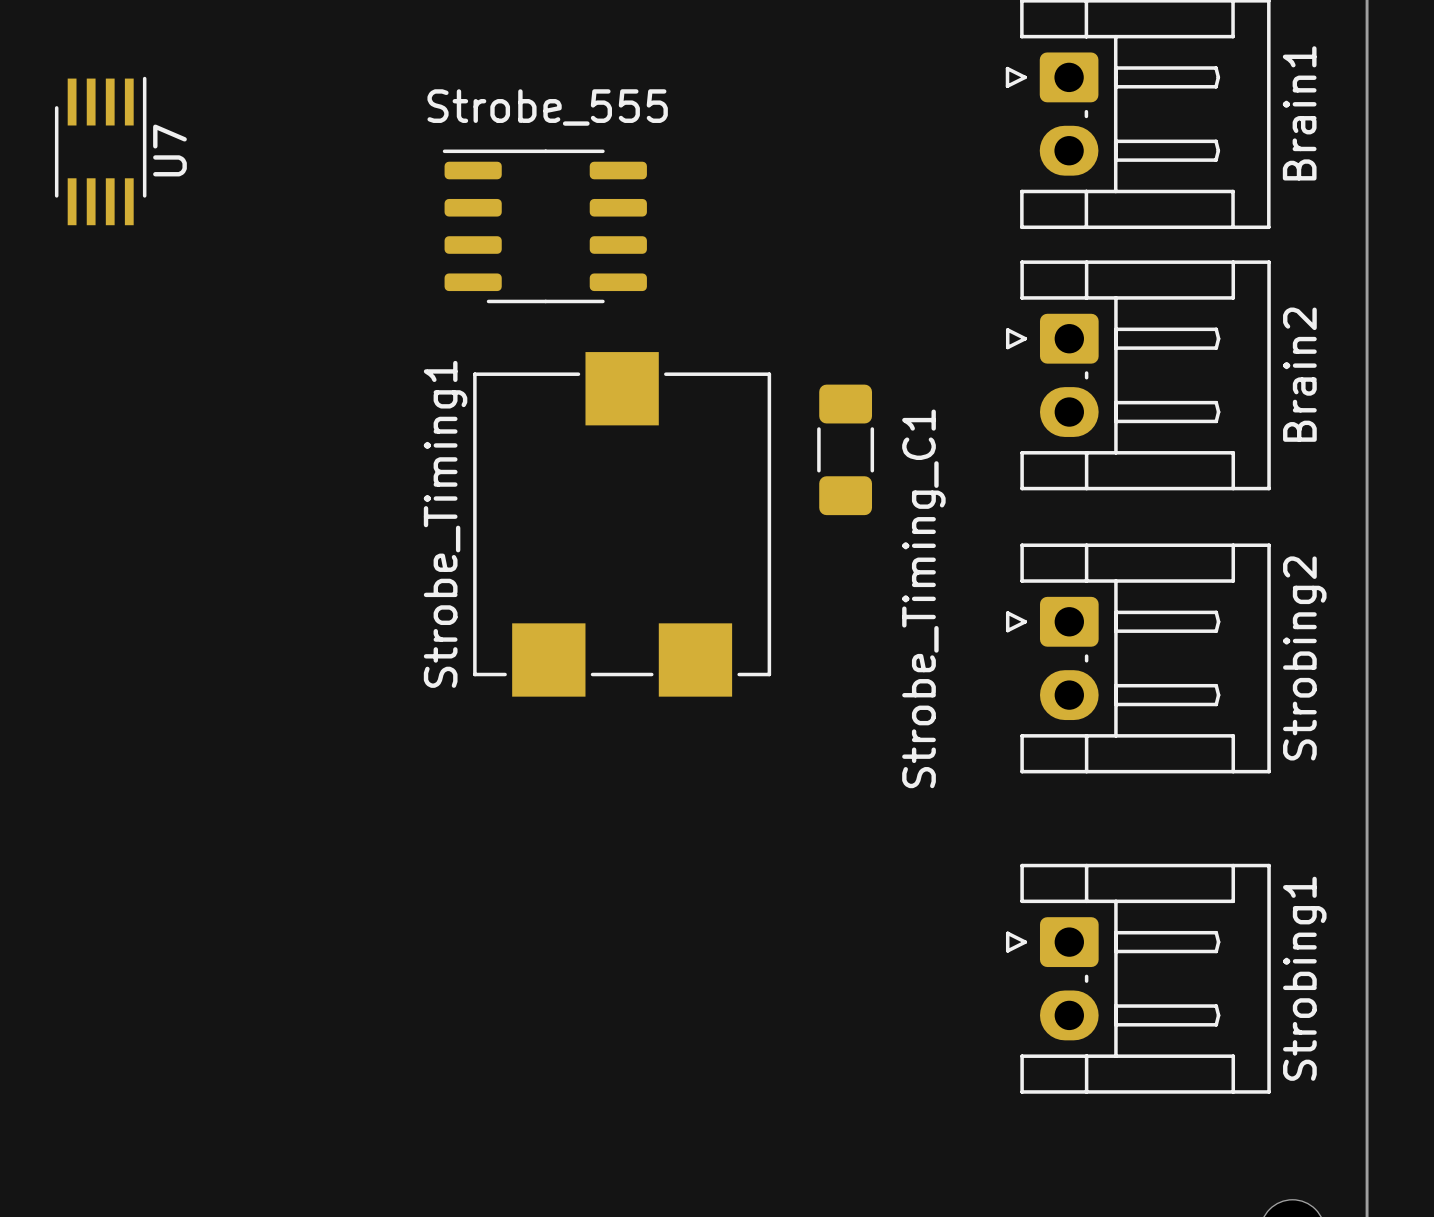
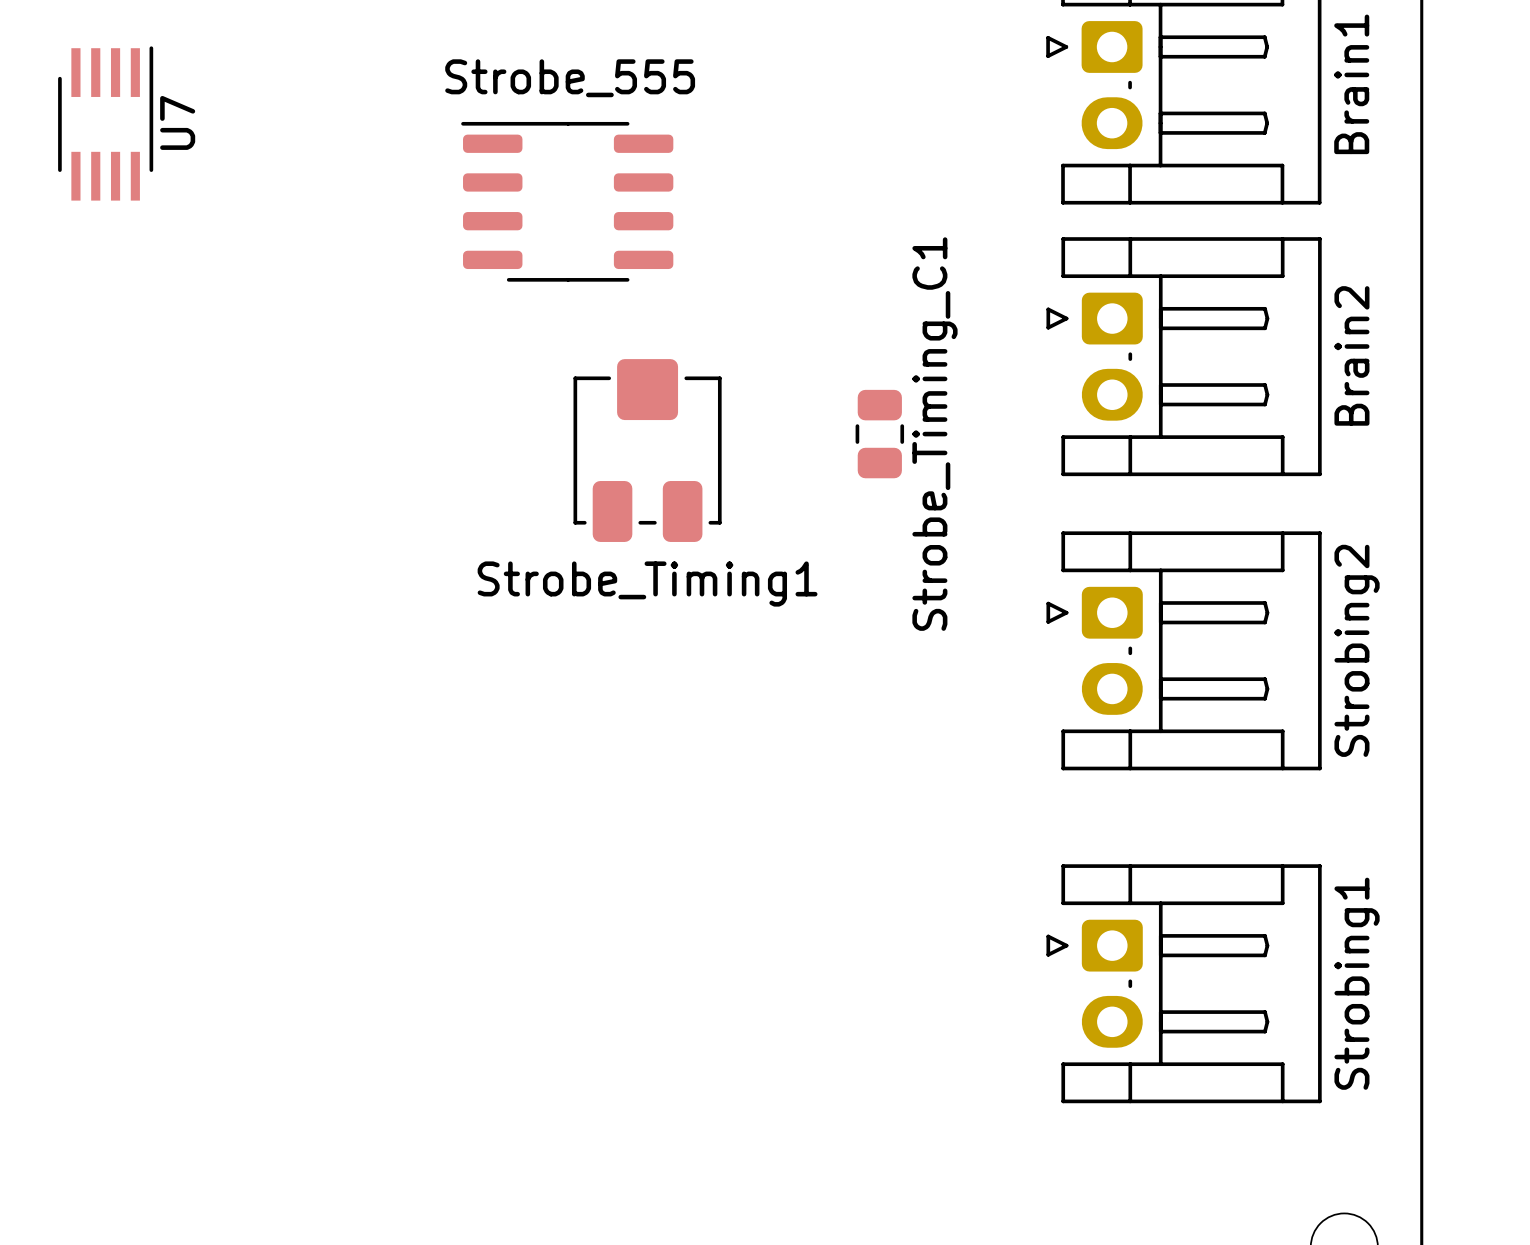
Strobe_Timing1 footprint: [473, 352, 772, 697] -> [573, 359, 722, 542]
Strobe_Timing_C1 footprint: [817, 384, 875, 516] -> [855, 389, 905, 479]
Strobe_Timing1 name position: Strobe_Timing1 (445, 524) -> Strobe_Timing1 (647, 584)
Strobe_Timing_C1 name position: Strobe_Timing_C1 (923, 598) -> Strobe_Timing_C1 (934, 434)

